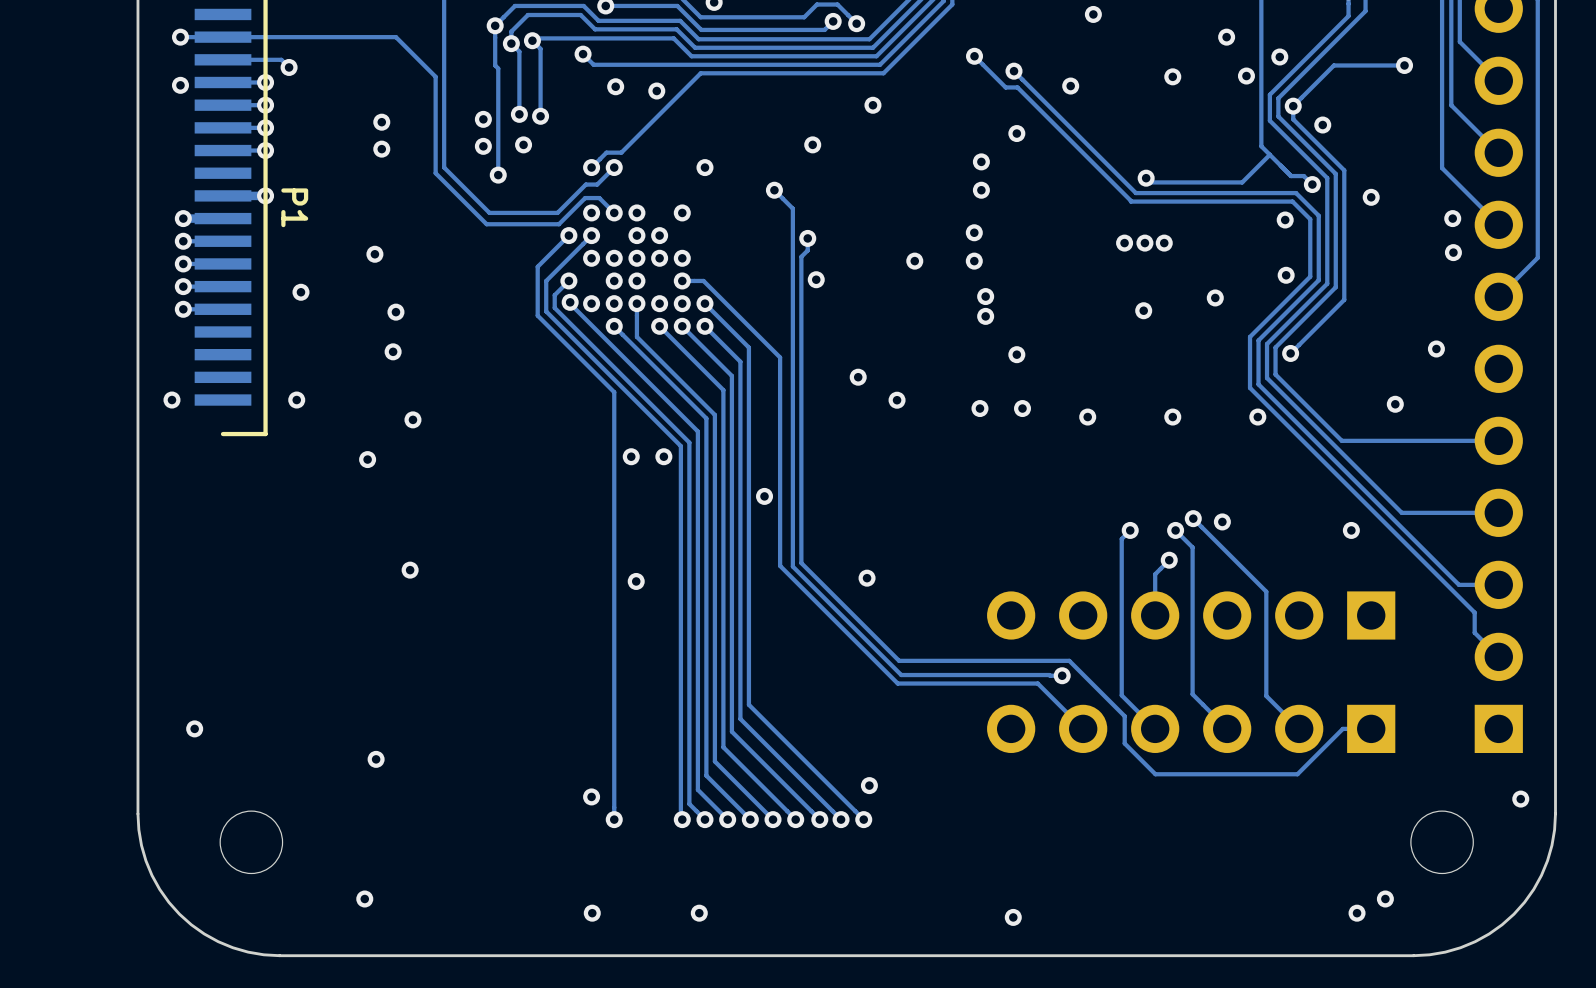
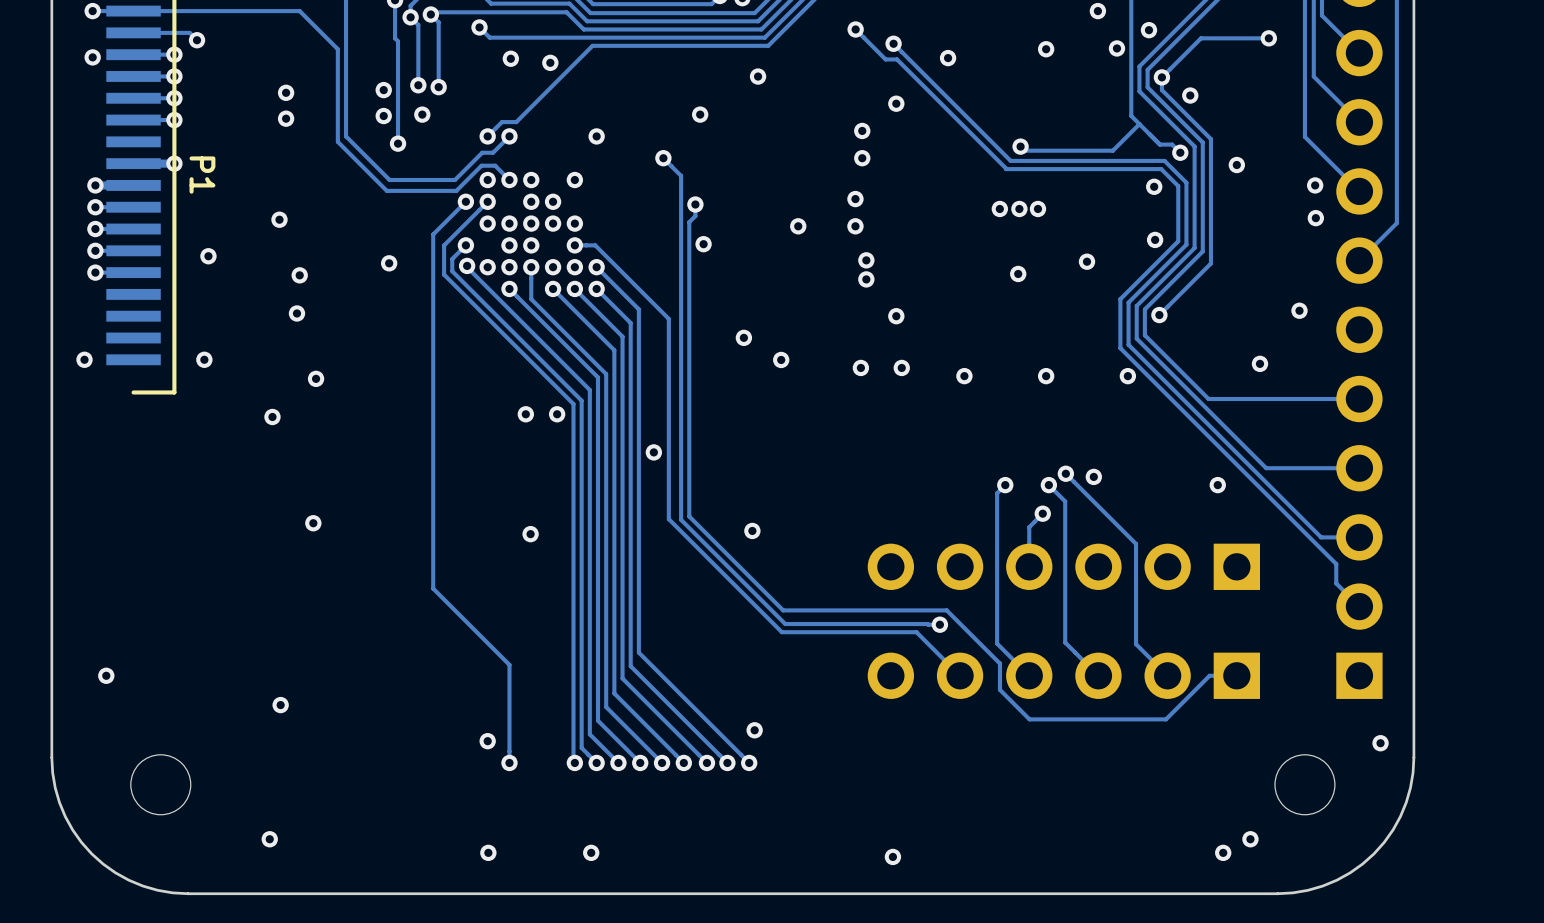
track: (537, 266) (537, 315) (614, 392) (614, 717) -> (435, 231) (433, 234) (433, 588) (509, 664)
via: none -> (389, 263)

